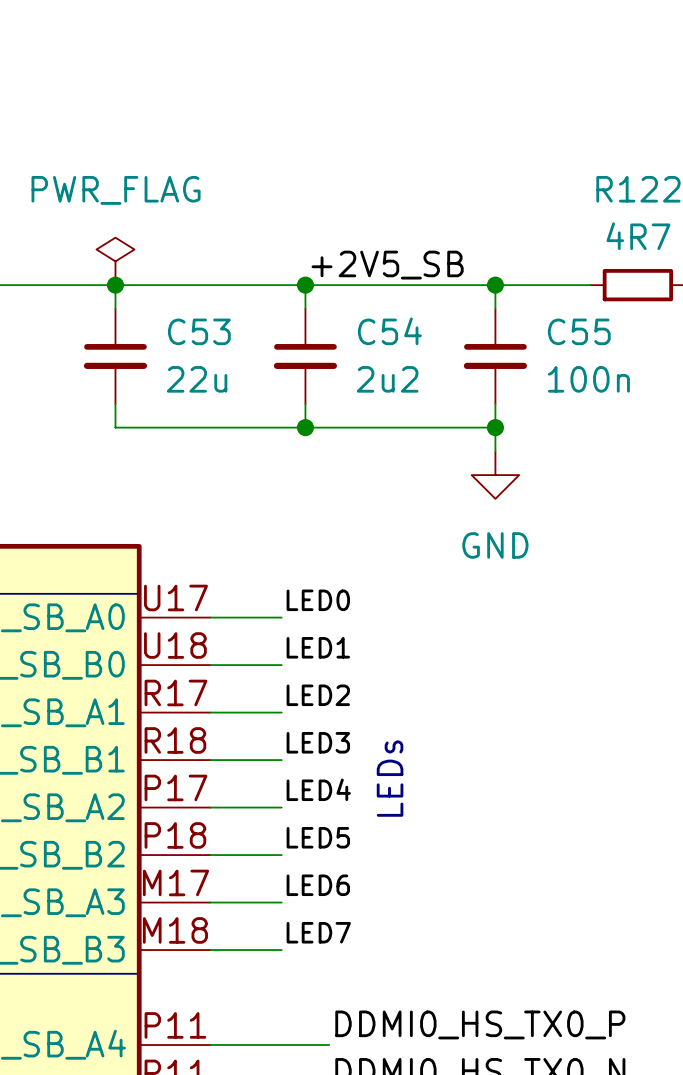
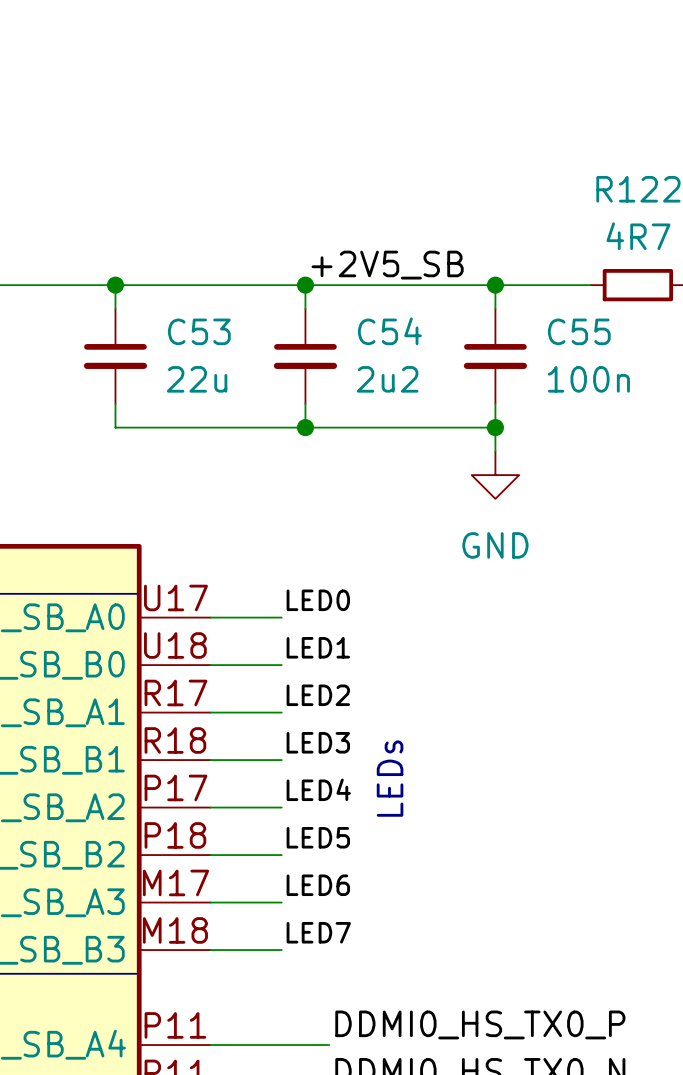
power symbol: PWR_FLAG (115, 261) -> none

